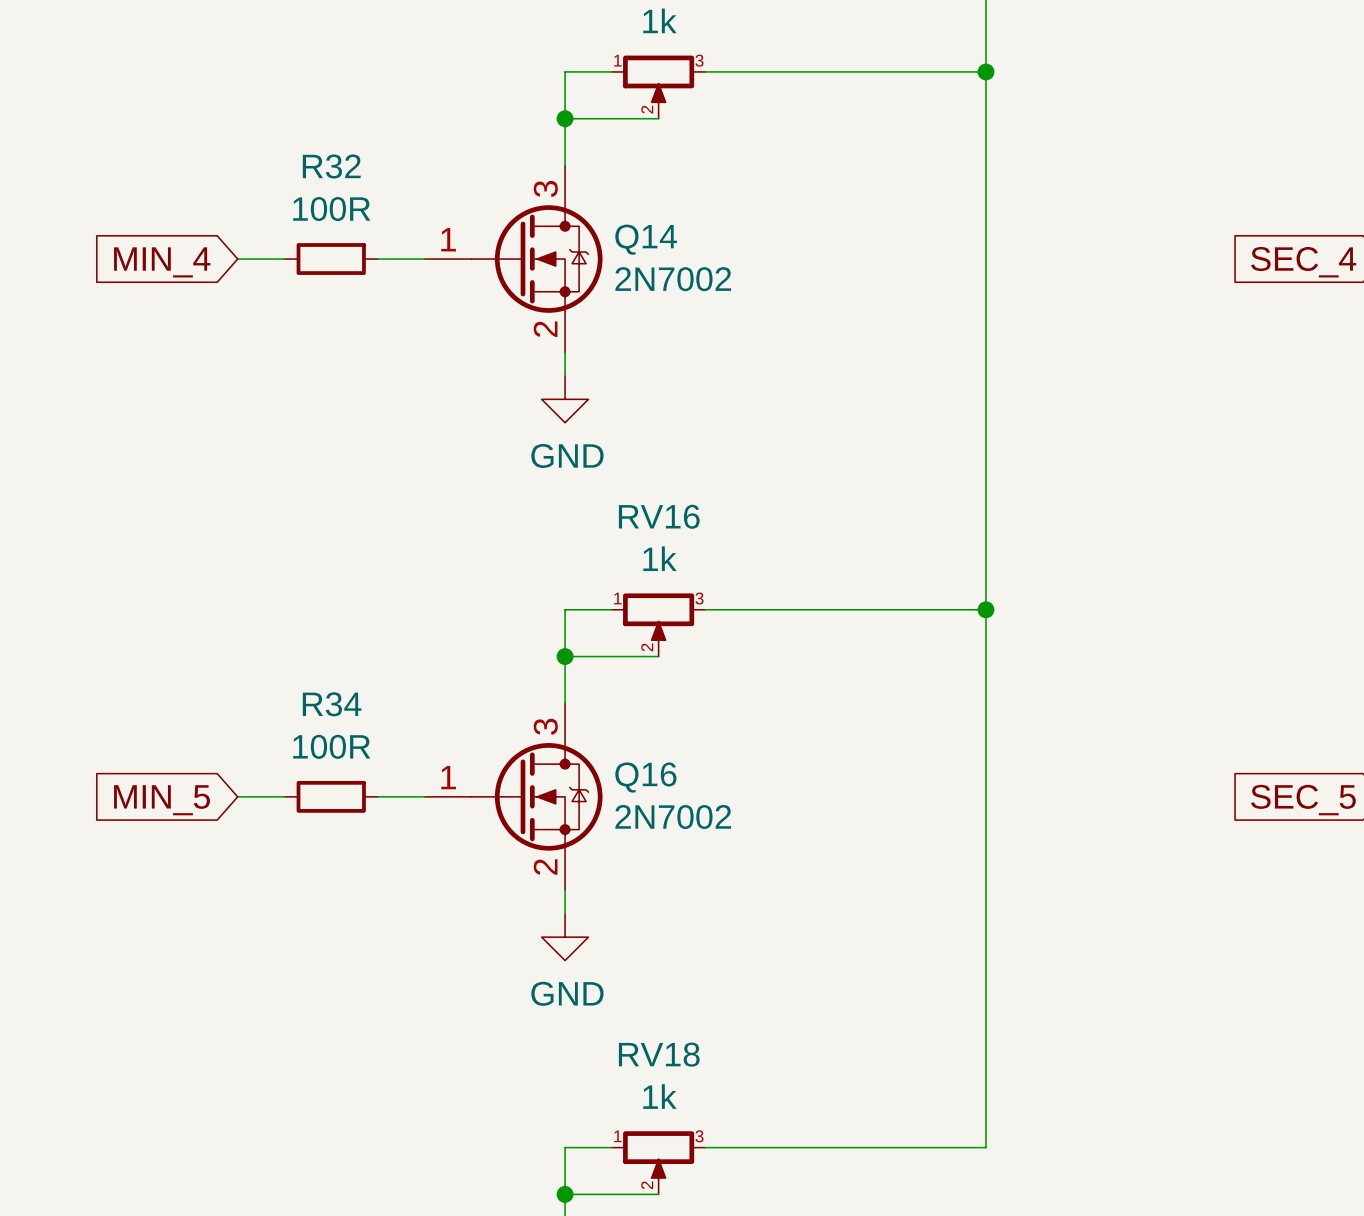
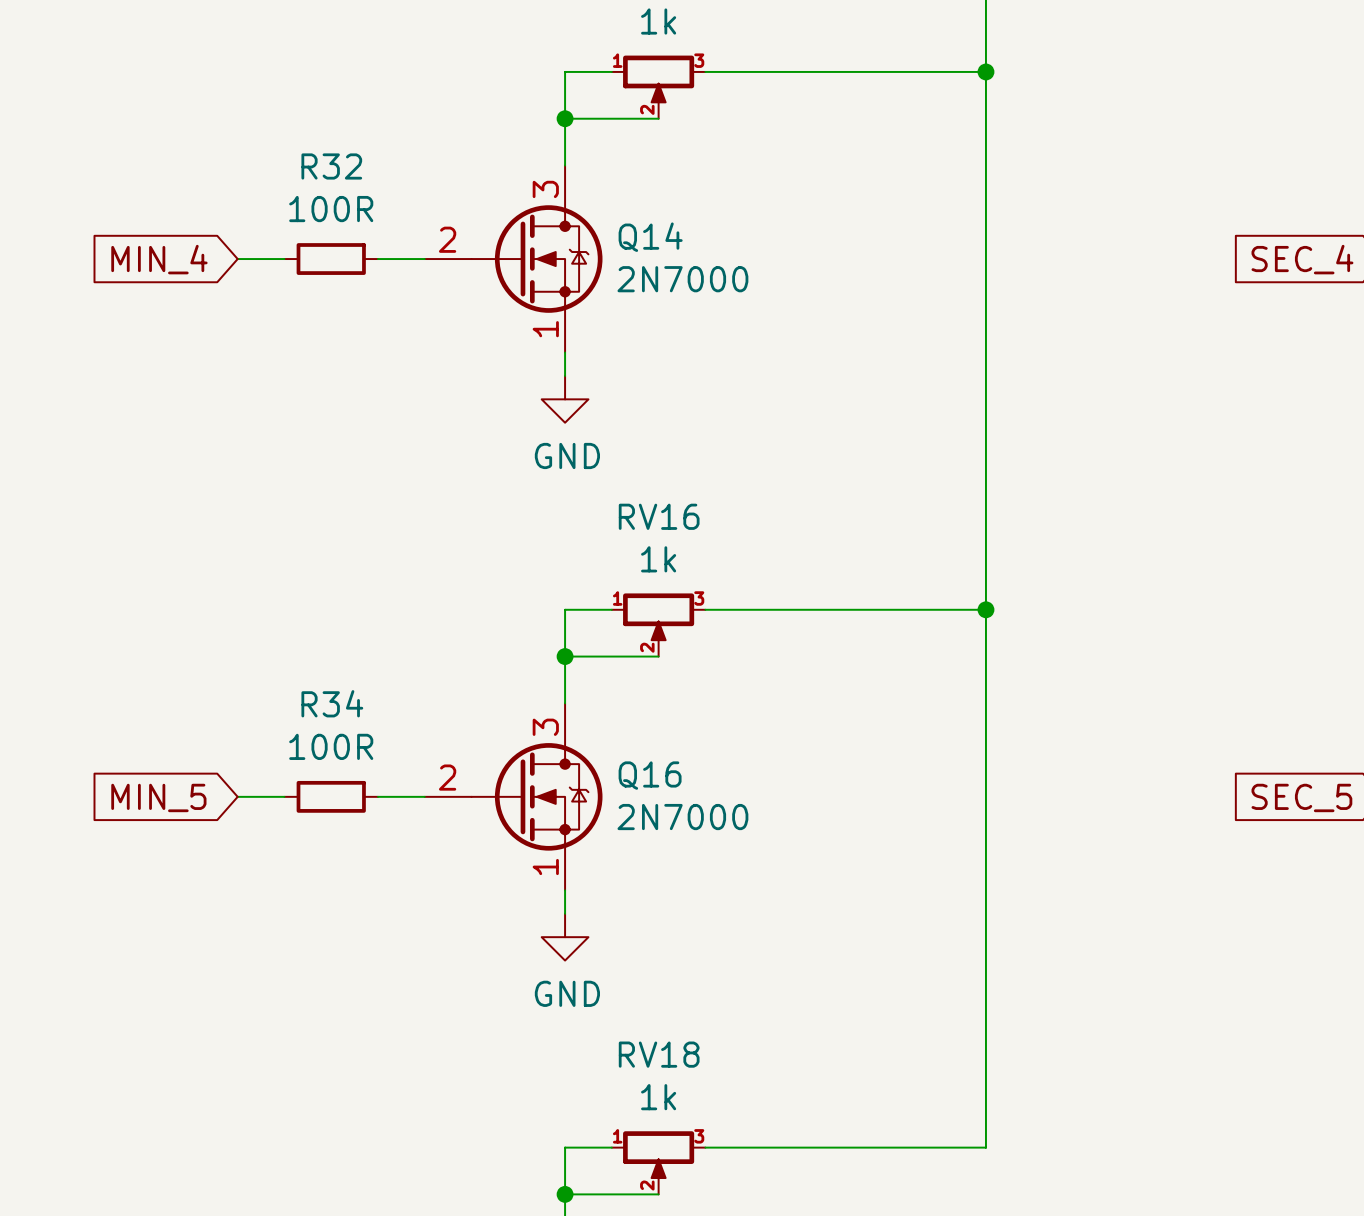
Q14 pin number: 1 (448, 239) -> 2 (447, 239)
Q14 value: 2N7002 (673, 279) -> 2N7000 (682, 279)
Q14 pin number: 2 (545, 329) -> 1 (545, 329)
Q16 pin number: 1 (448, 777) -> 2 (447, 777)
Q16 value: 2N7002 (673, 817) -> 2N7000 (682, 817)
Q16 pin number: 2 (545, 867) -> 1 (545, 867)

